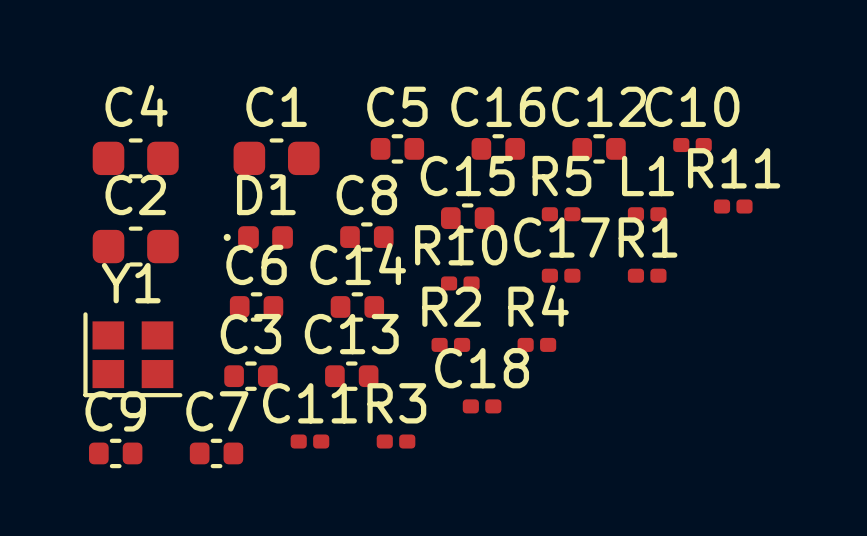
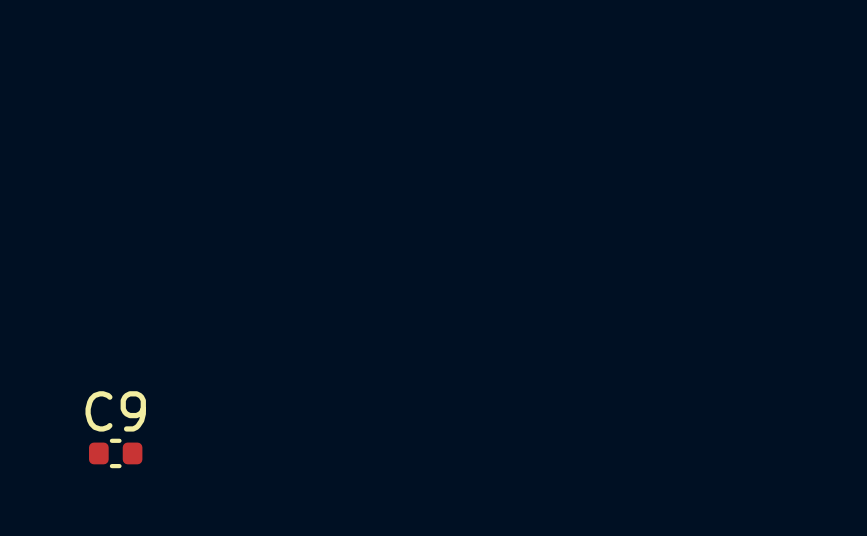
C10: (692, 145) -> none
C5: (397, 148) -> none
C16: (498, 148) -> none
C12: (599, 148) -> none
C4: (135, 158) -> none
C1: (276, 158) -> none
R11: (733, 206) -> none
R5: (561, 214) -> none
L1: (647, 214) -> none
C15: (467, 218) -> none
D1: (258, 237) -> none
C8: (366, 237) -> none
C2: (135, 246) -> none
C17: (561, 275) -> none
R1: (647, 275) -> none
R10: (460, 283) -> none
C6: (256, 306) -> none
C14: (357, 306) -> none
R2: (450, 344) -> none
R4: (536, 344) -> none
Y1: (132, 354) -> none
C3: (250, 376) -> none
C13: (351, 376) -> none
C18: (482, 406) -> none
C11: (309, 441) -> none
R3: (396, 441) -> none
C7: (216, 453) -> none

